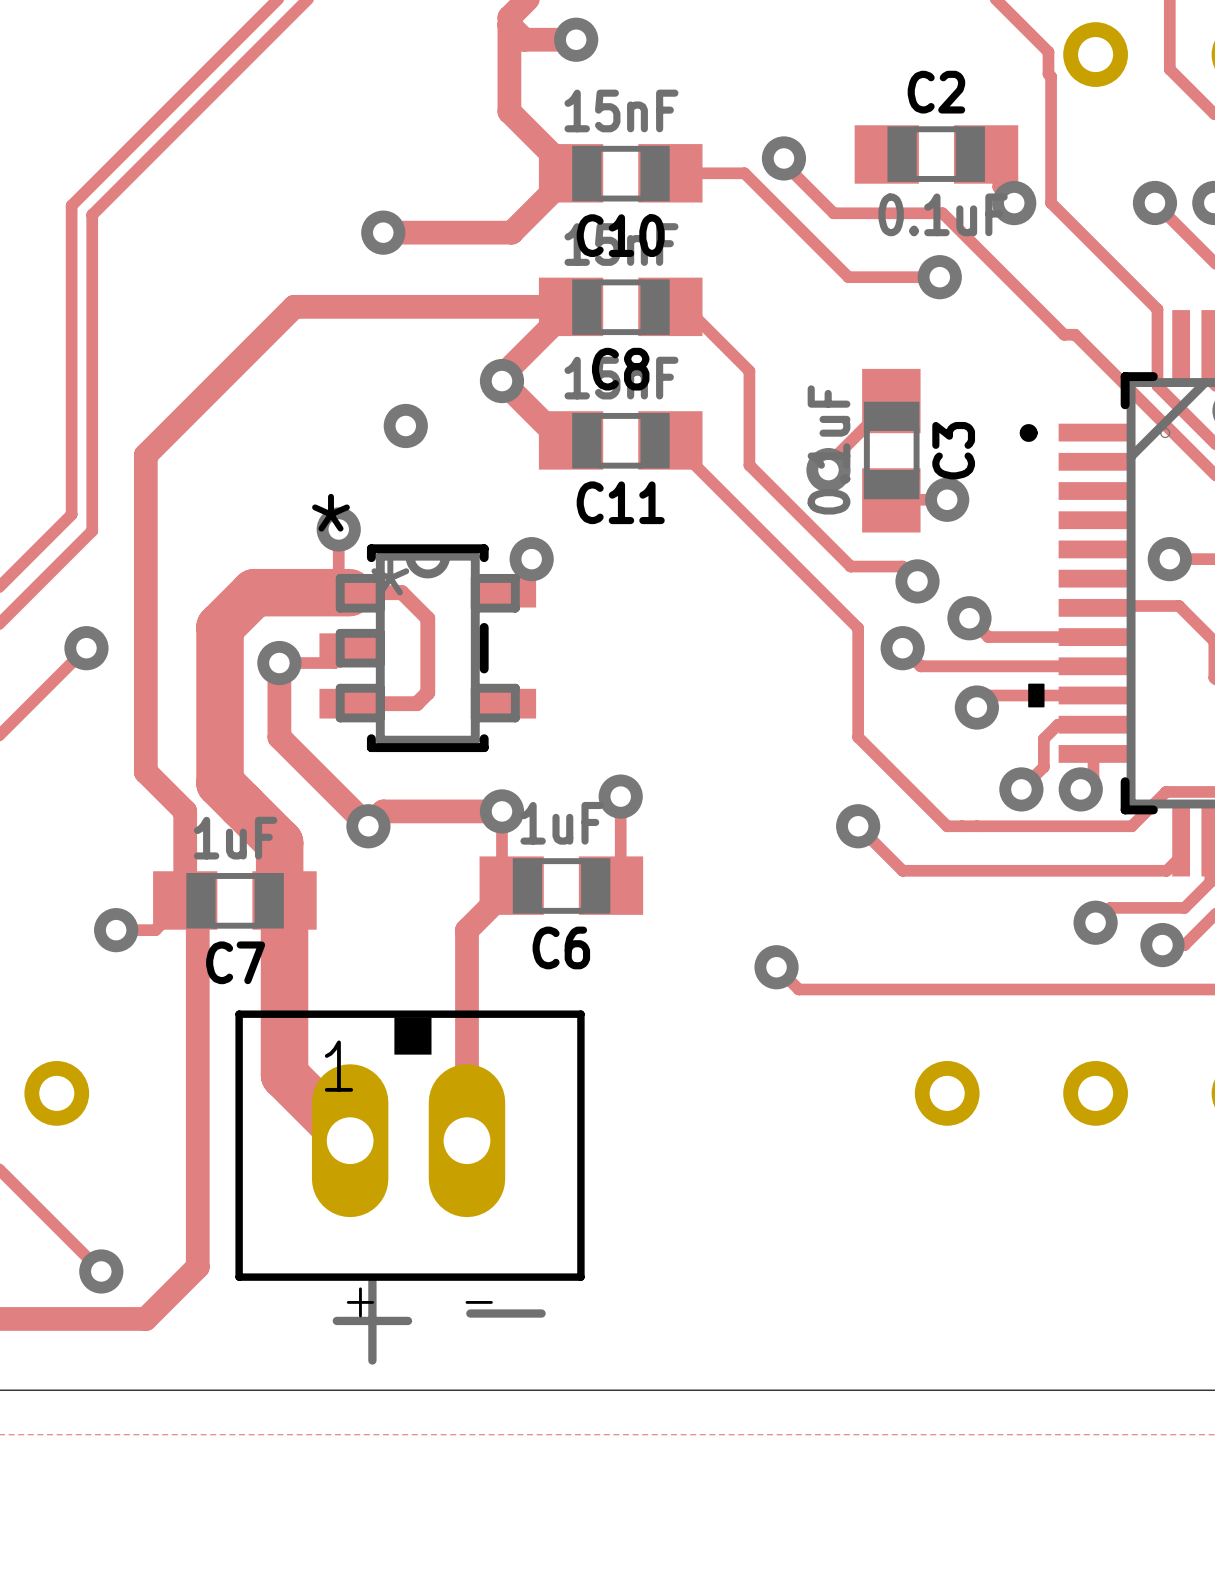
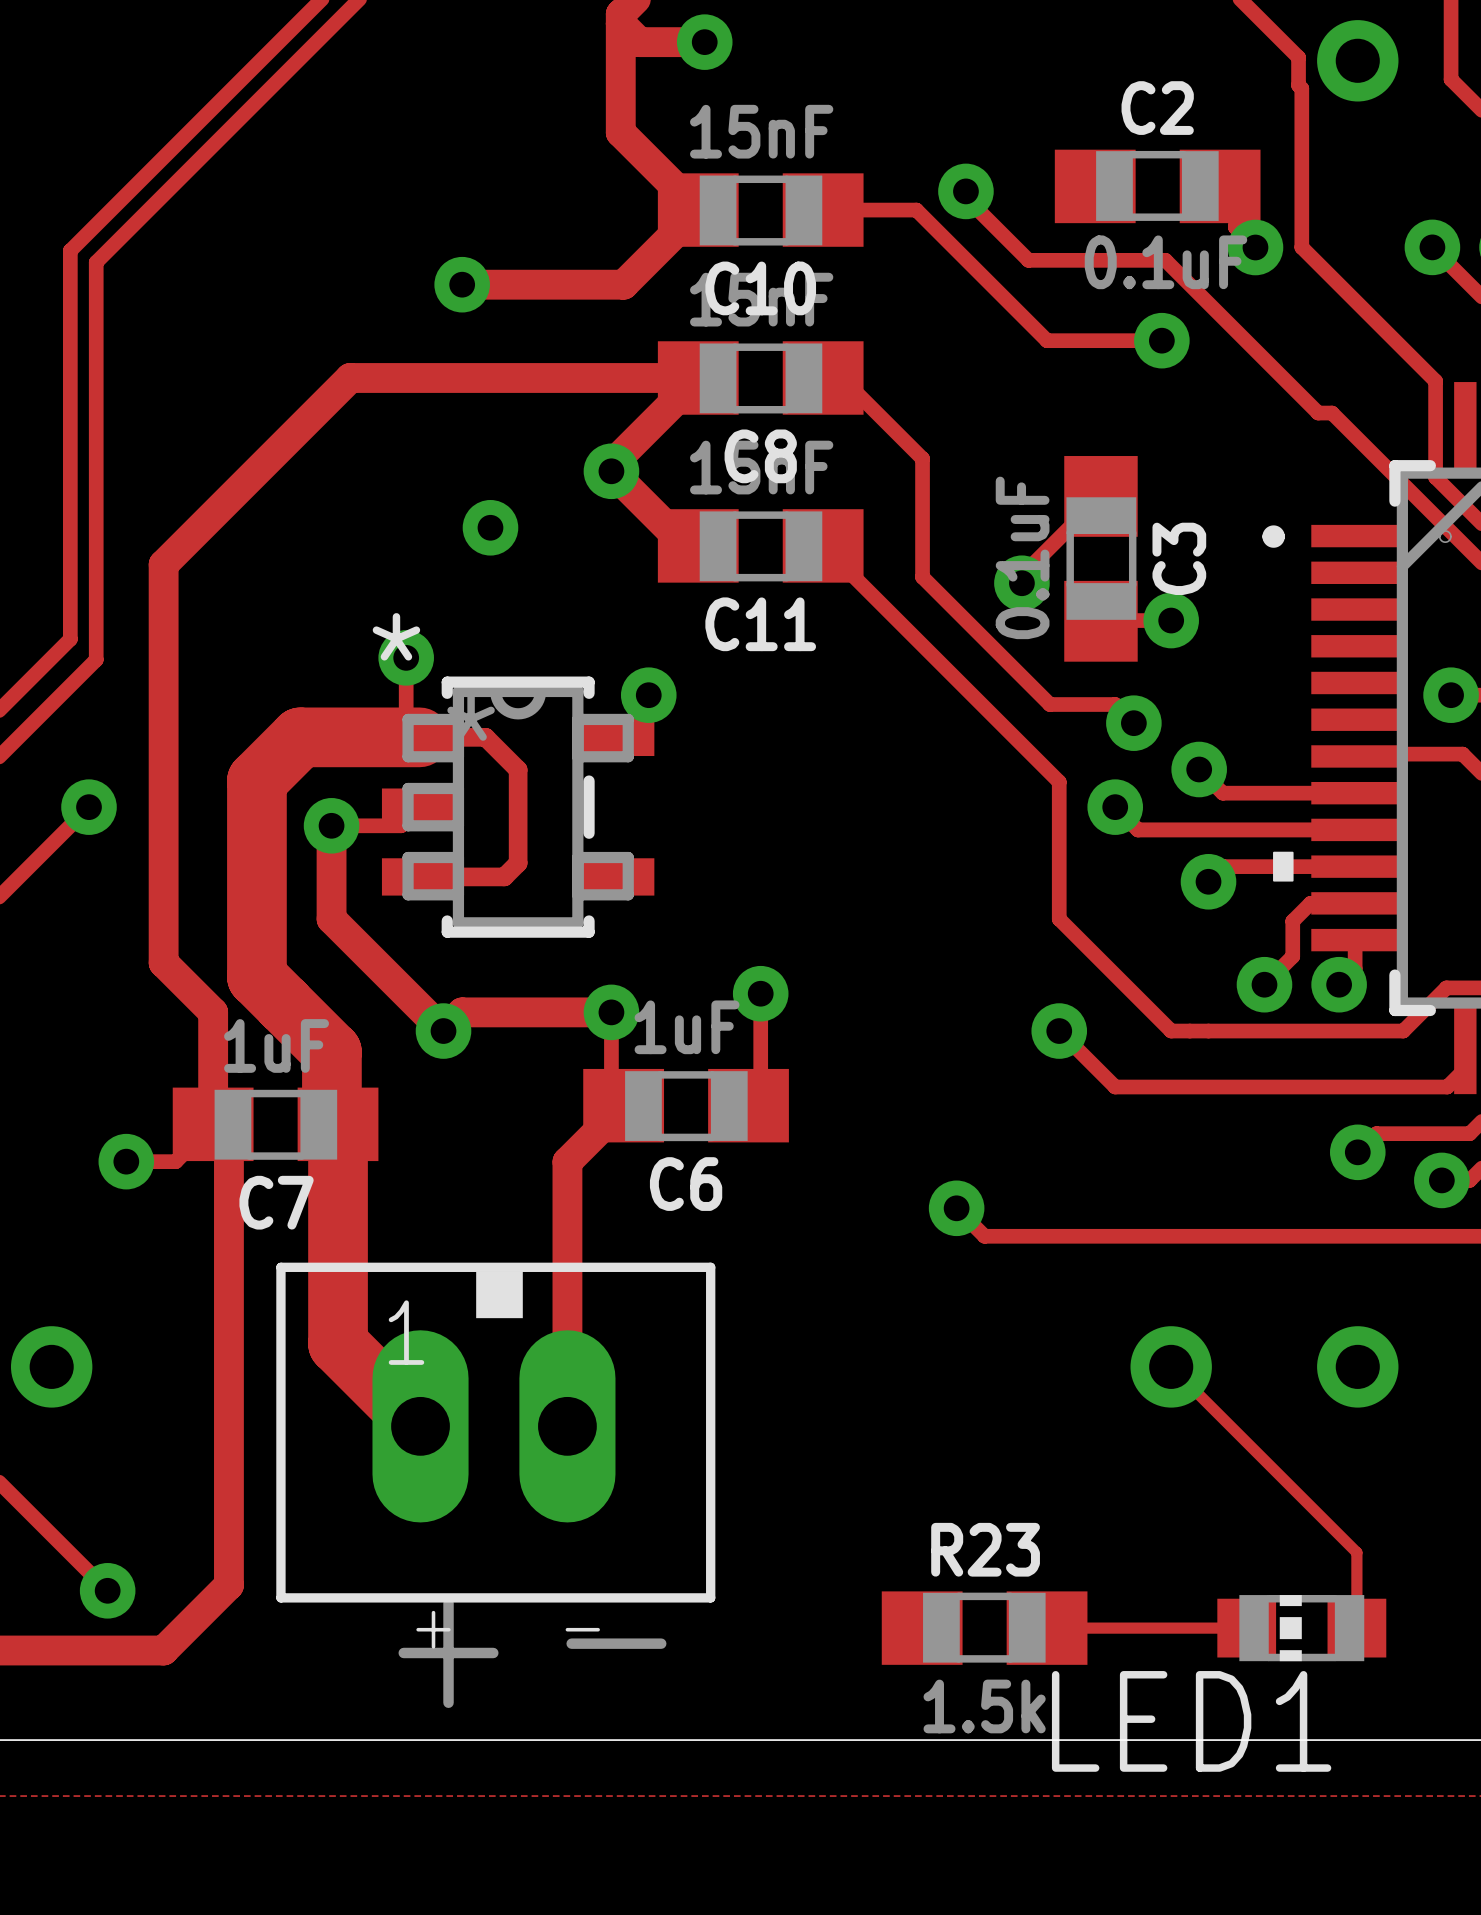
track: none -> (1171, 1366) (1356, 1552) (1356, 1628)
R23: none -> 1.5k (984, 1628)
track: none -> (1047, 1628) (1246, 1628)
LED1: none -> (1301, 1628)

